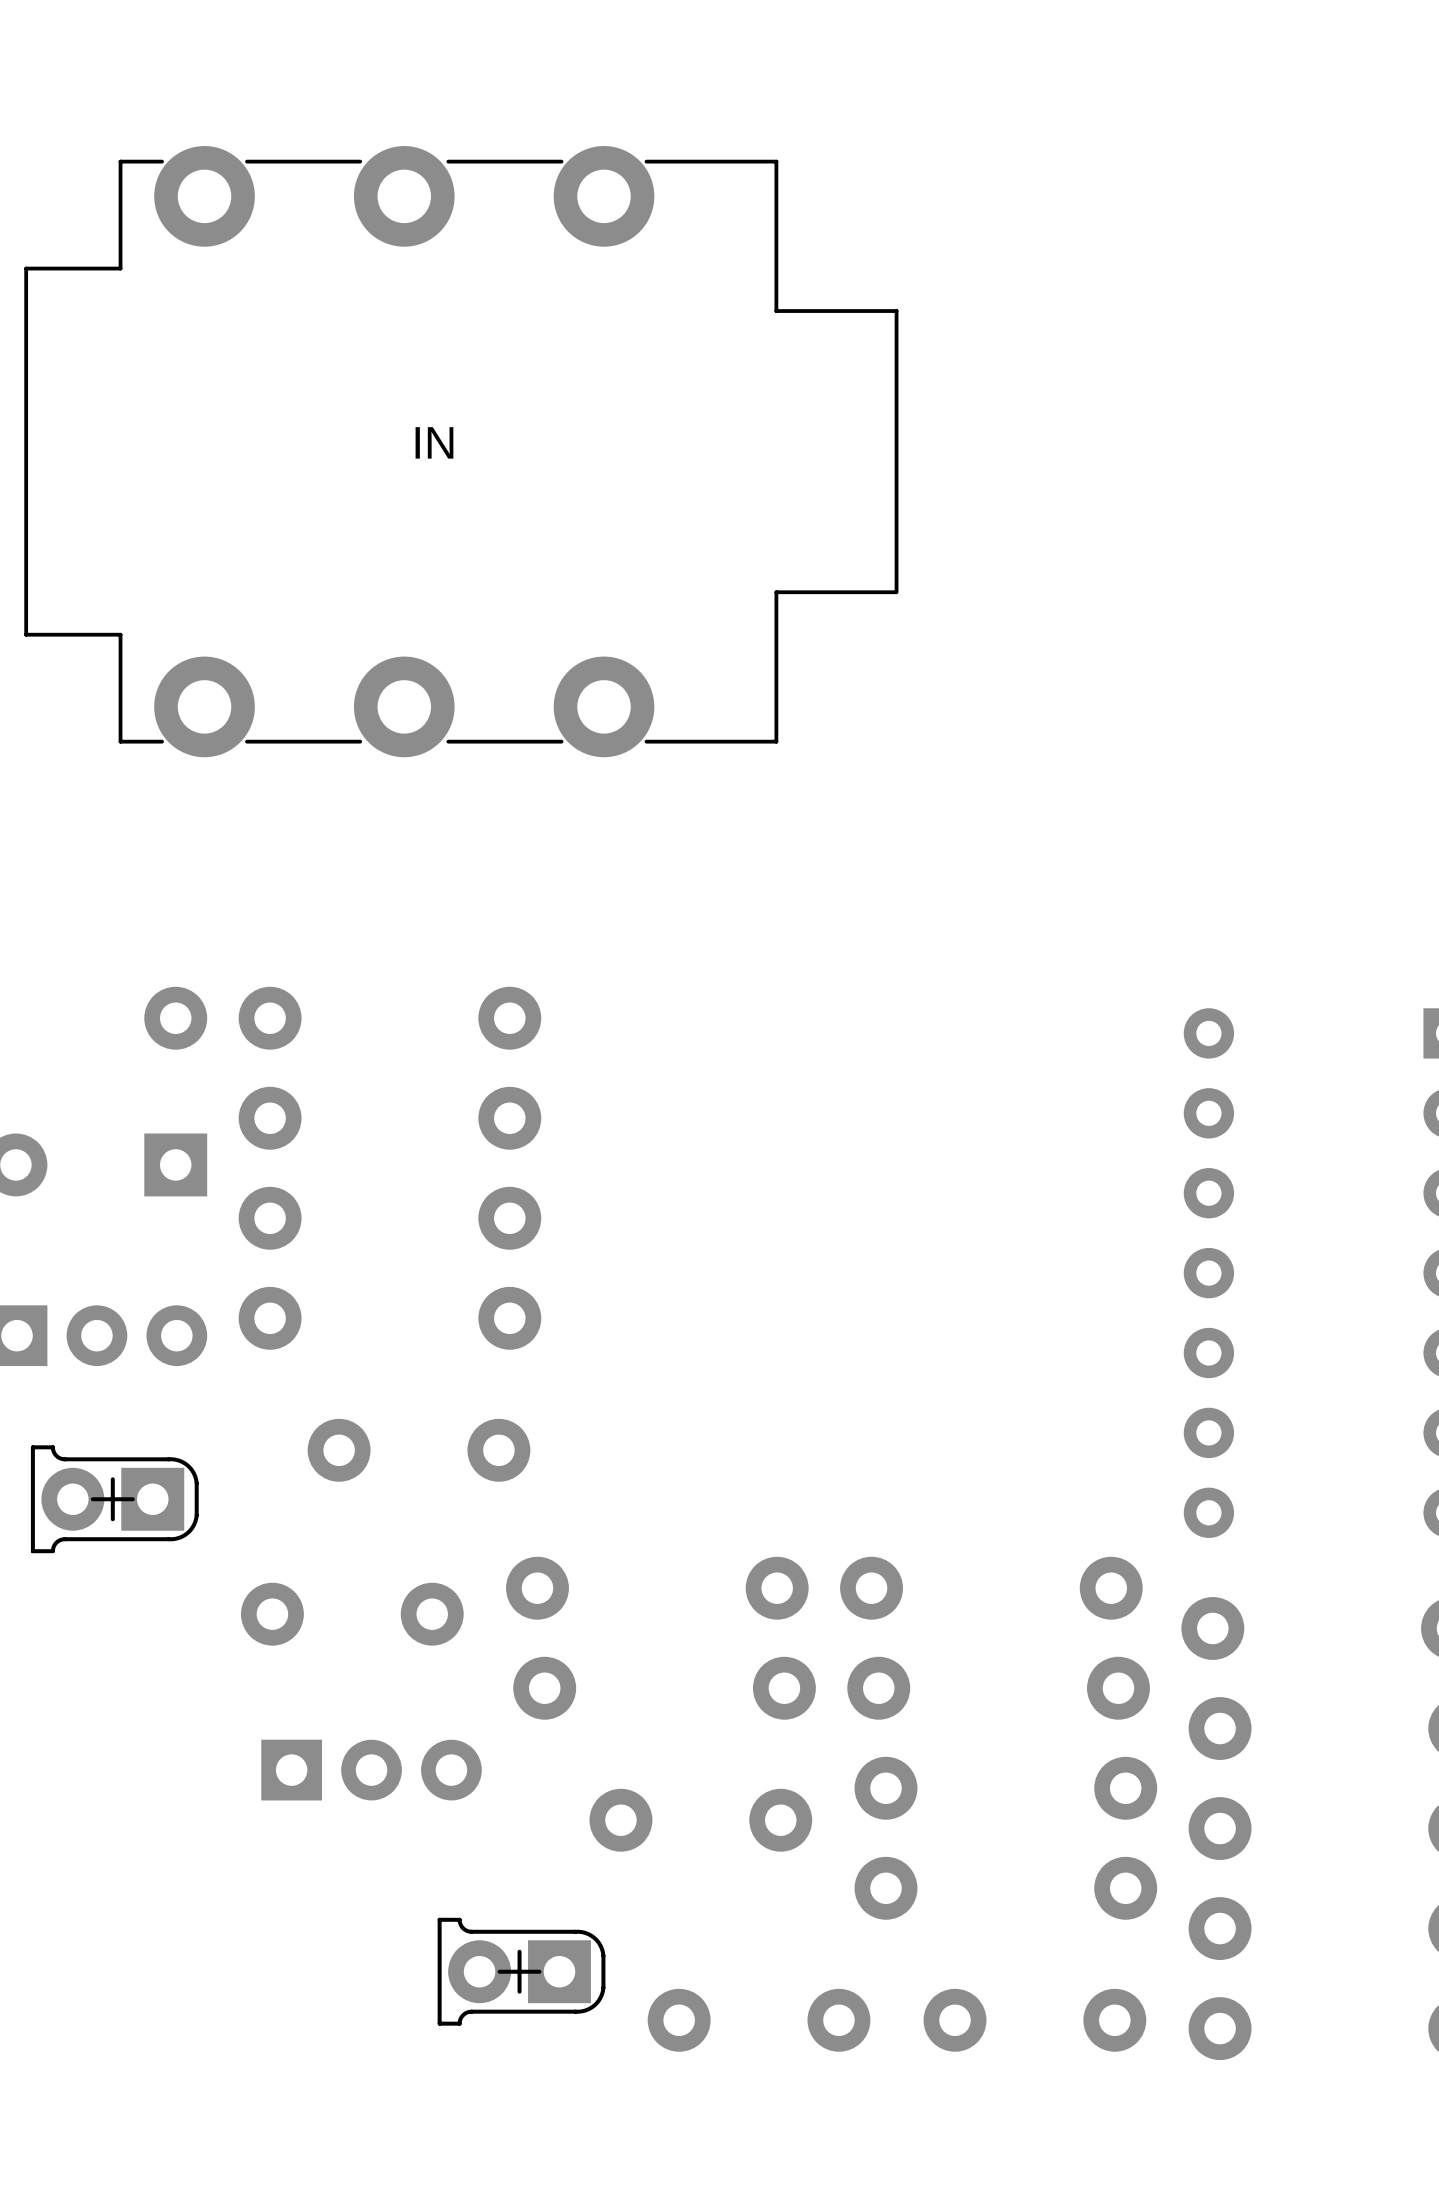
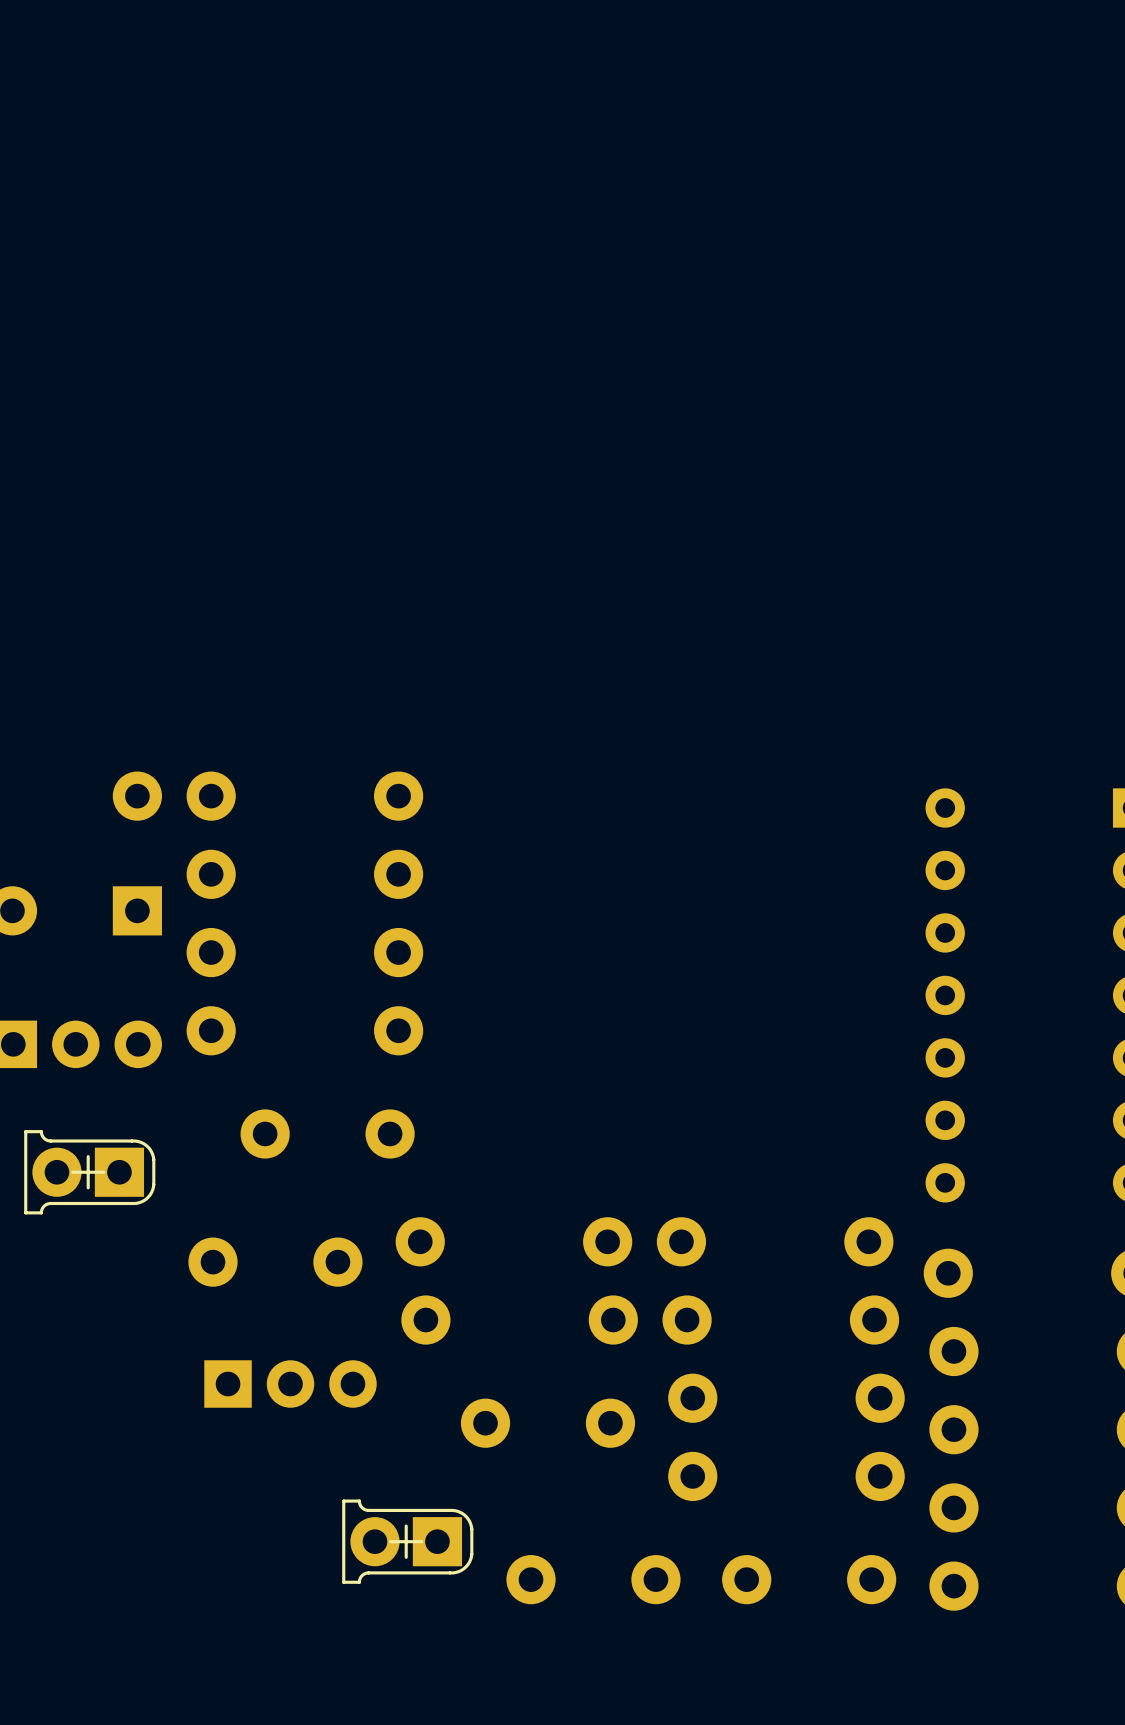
part: IN (461, 451) -> none

